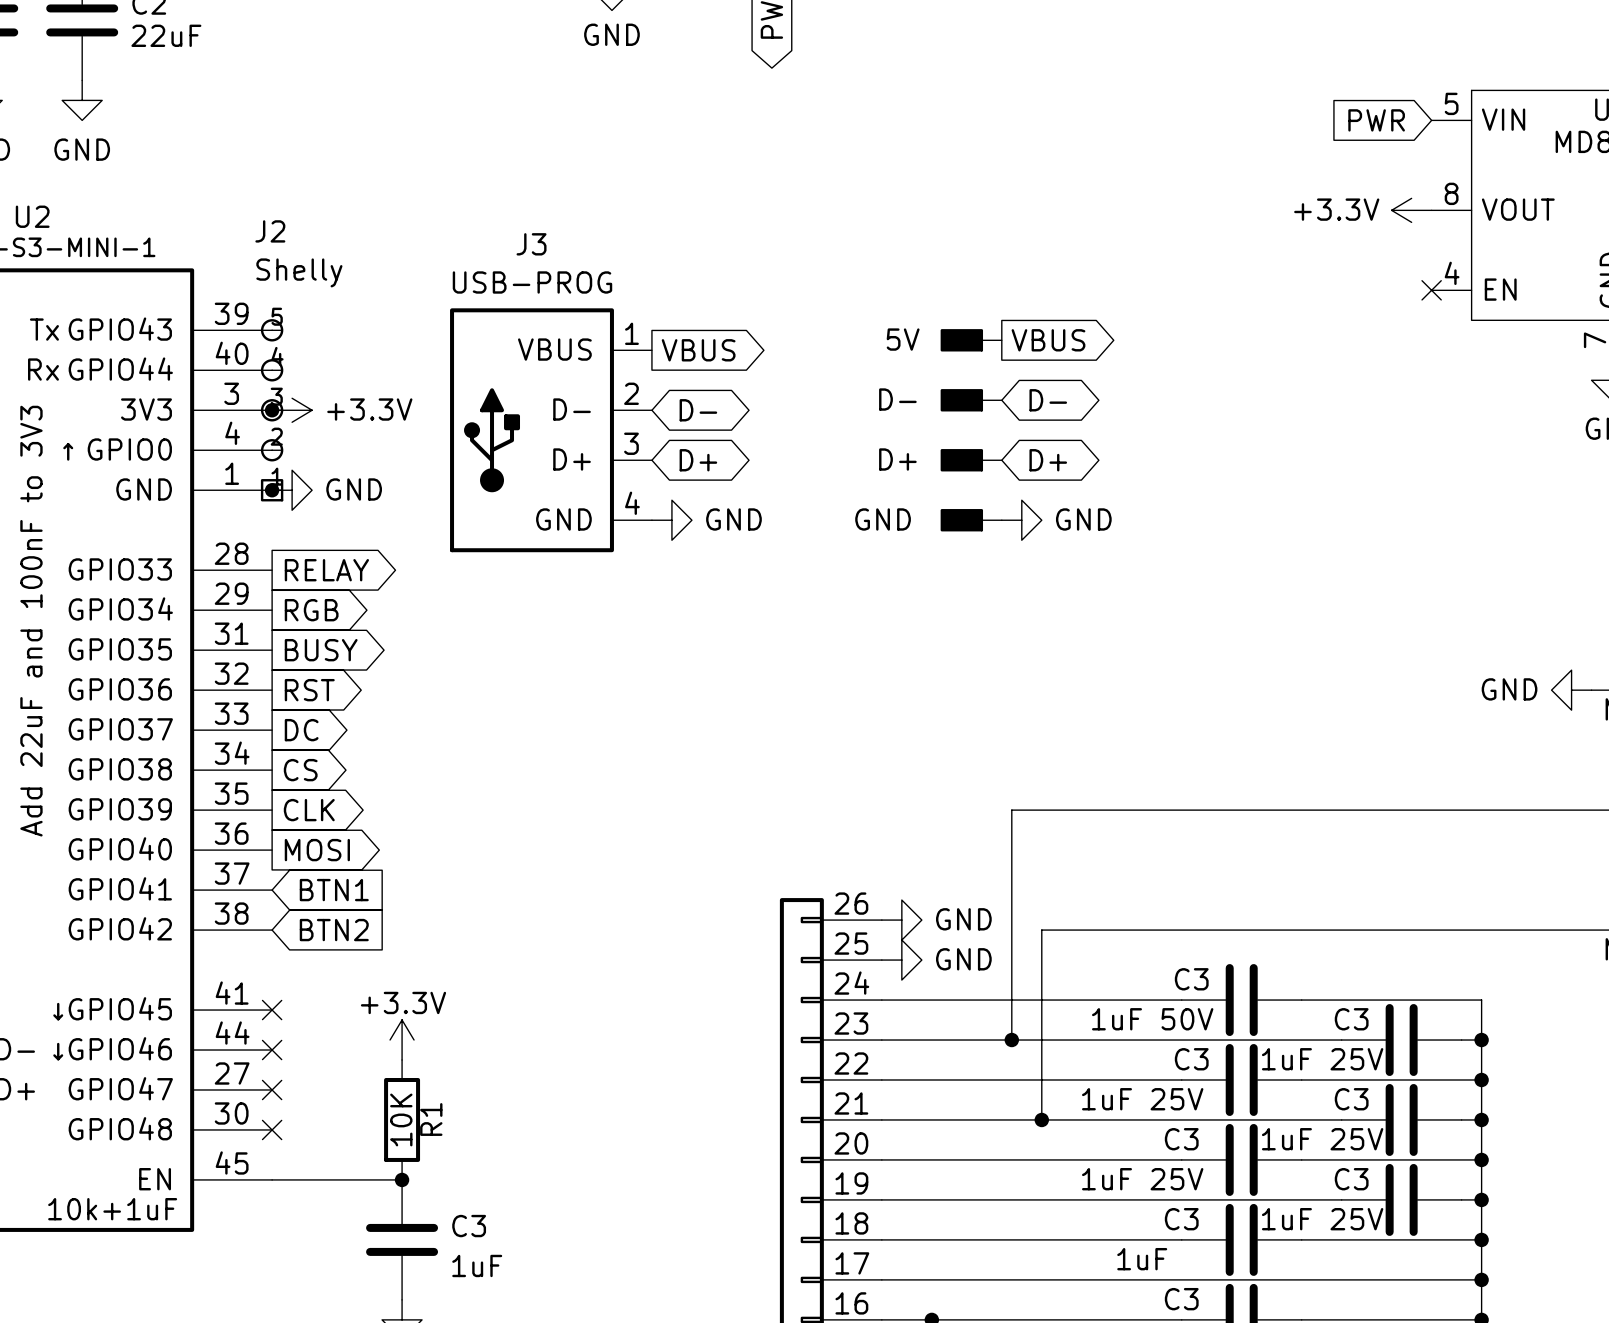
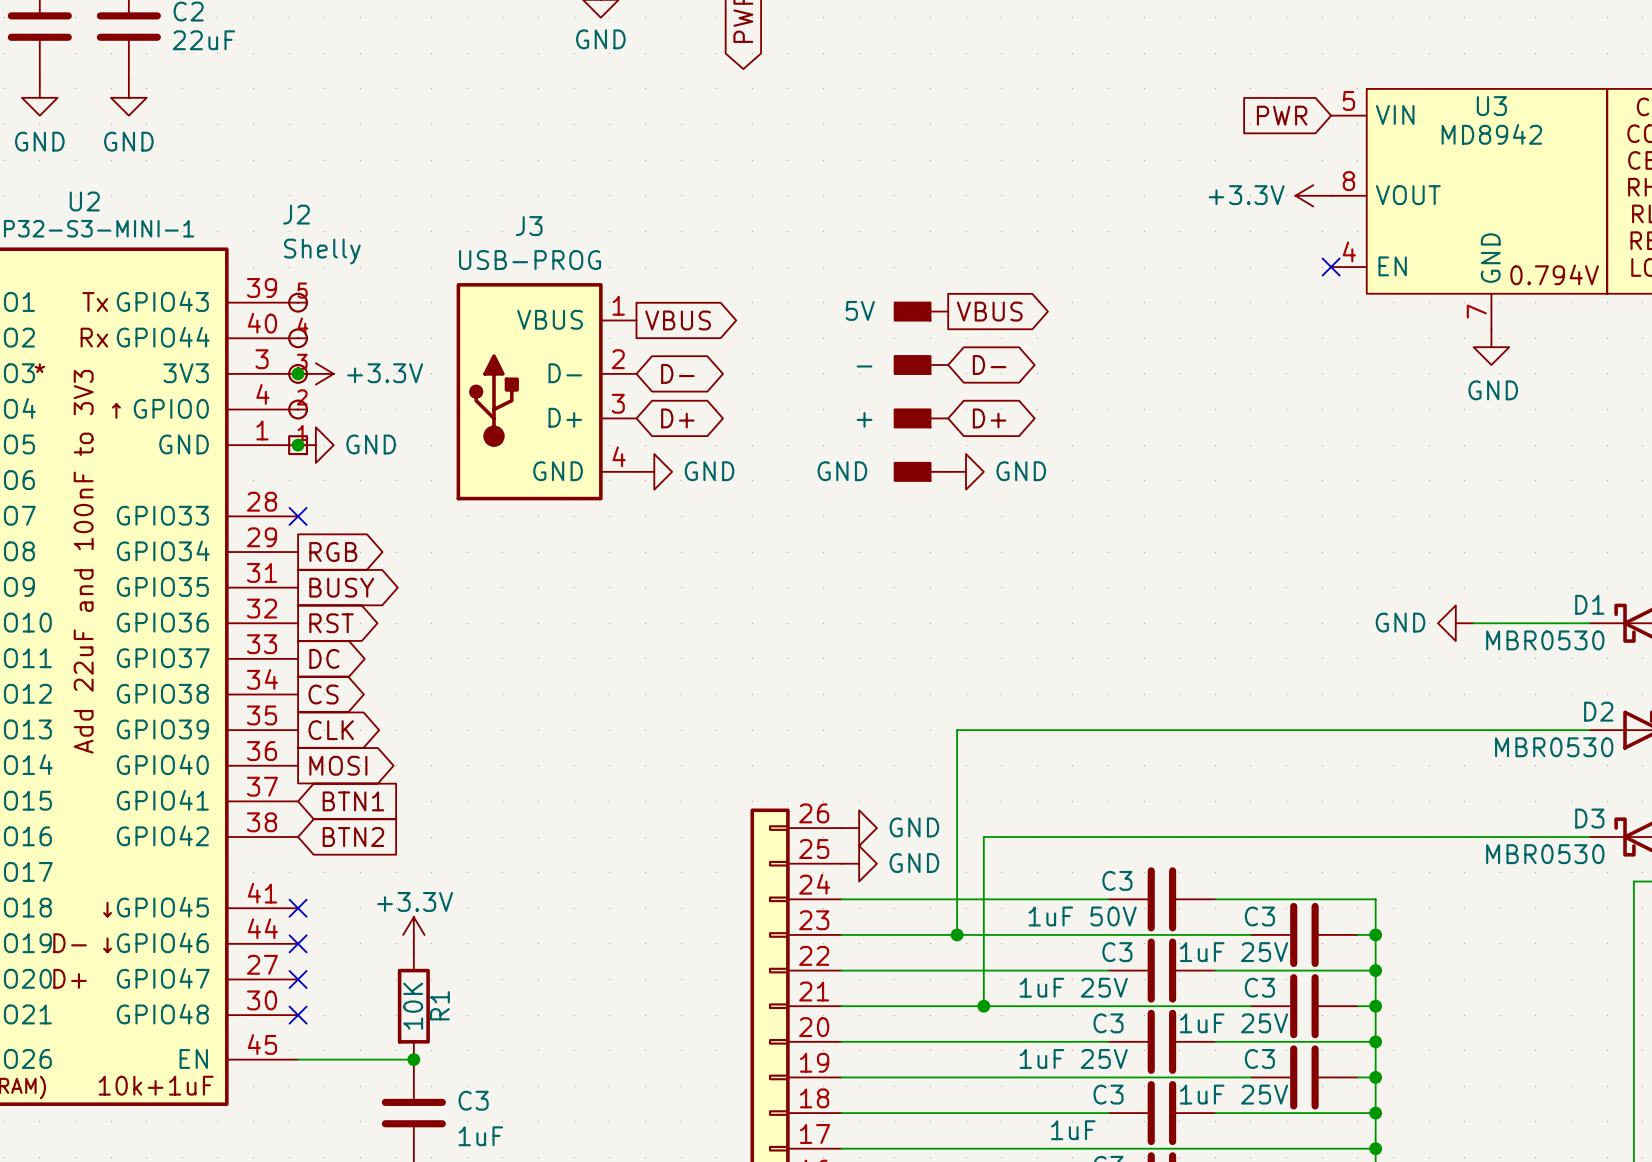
part value: D- (897, 399) -> - (864, 366)
part value: D+ (897, 459) -> + (864, 419)
no-connect mark: none -> (298, 516)
global label: RELAY (326, 570) -> none

